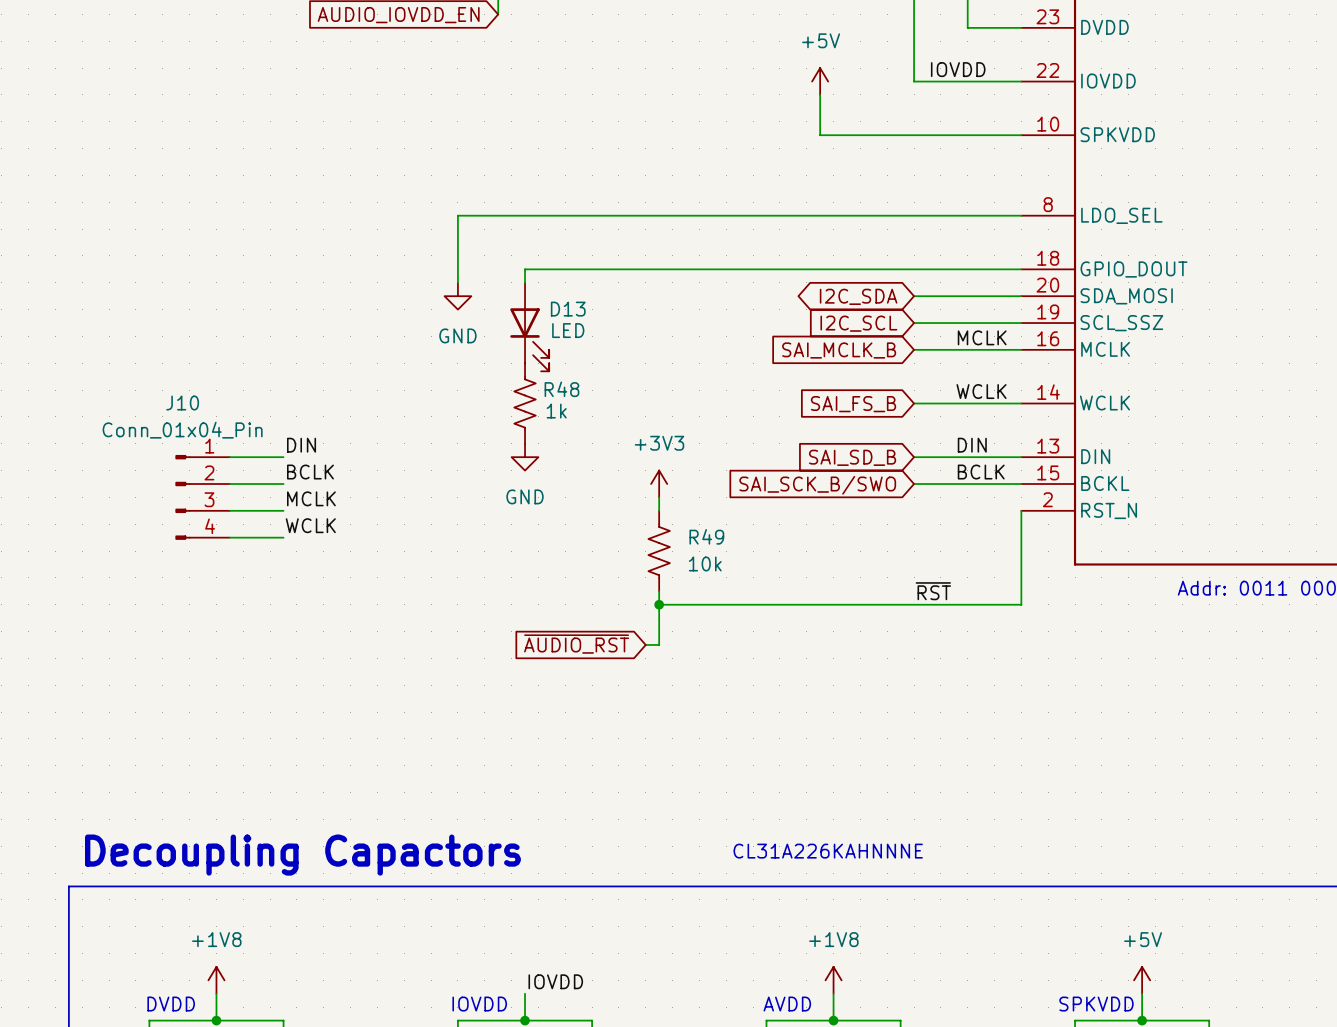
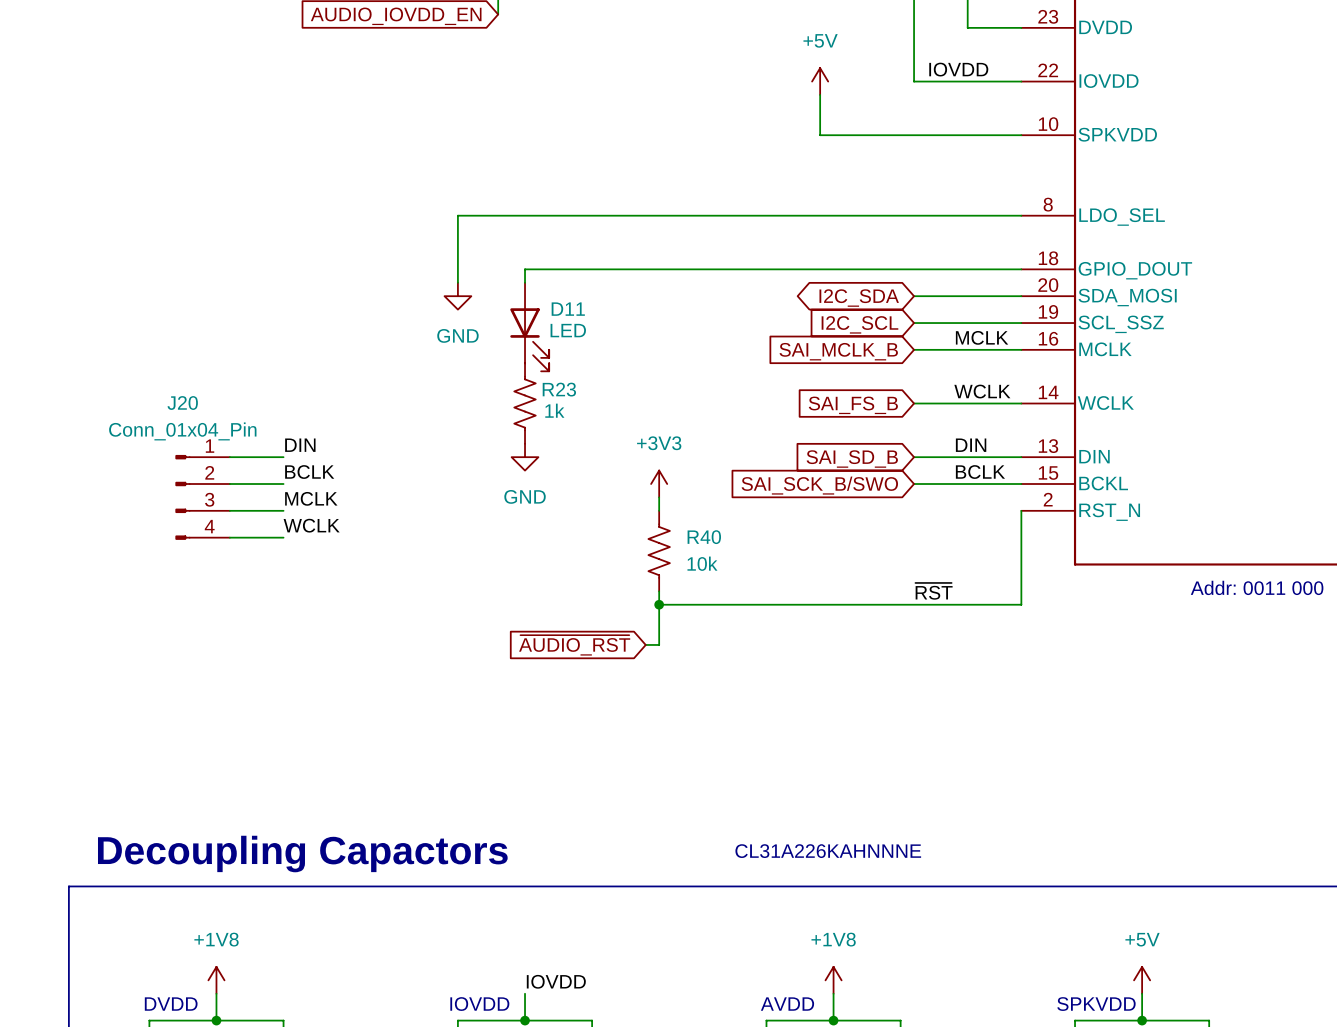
D13 name: D13 (568, 309) -> D11 (568, 309)
R48 name: R48 (561, 389) -> R23 (559, 389)
J10 name: J10 (182, 403) -> J20 (182, 403)
R49 name: R49 (706, 536) -> R40 (704, 537)

